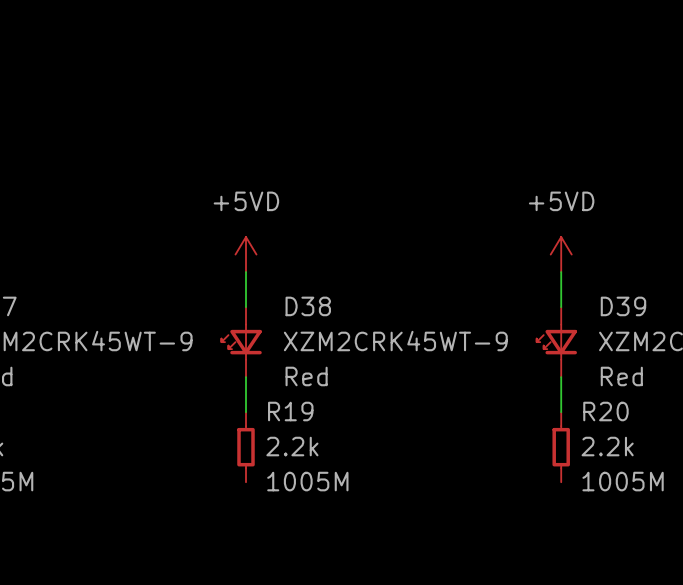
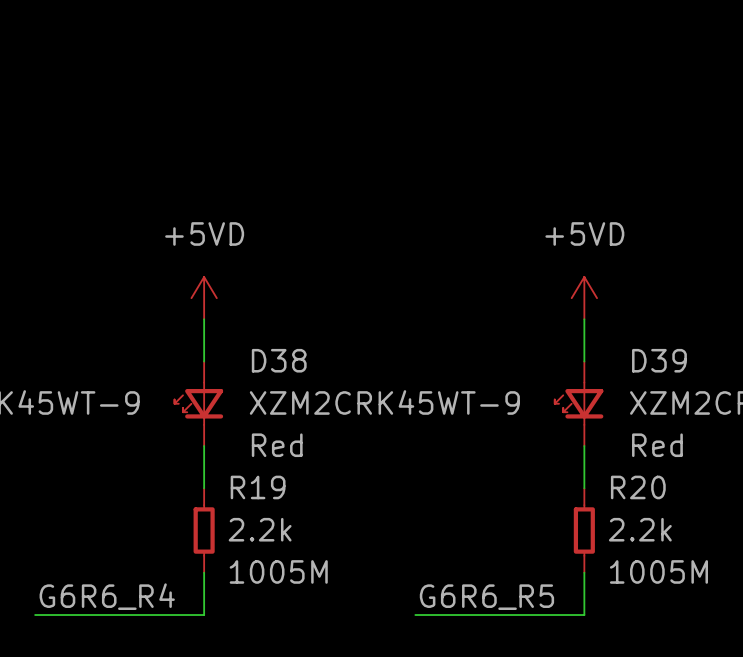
wire: none -> (204, 572) (204, 615) (35, 615)
wire: none -> (584, 572) (584, 615) (415, 615)
label: none -> G6R6_R4 (107, 596)
label: none -> G6R6_R5 (486, 597)

